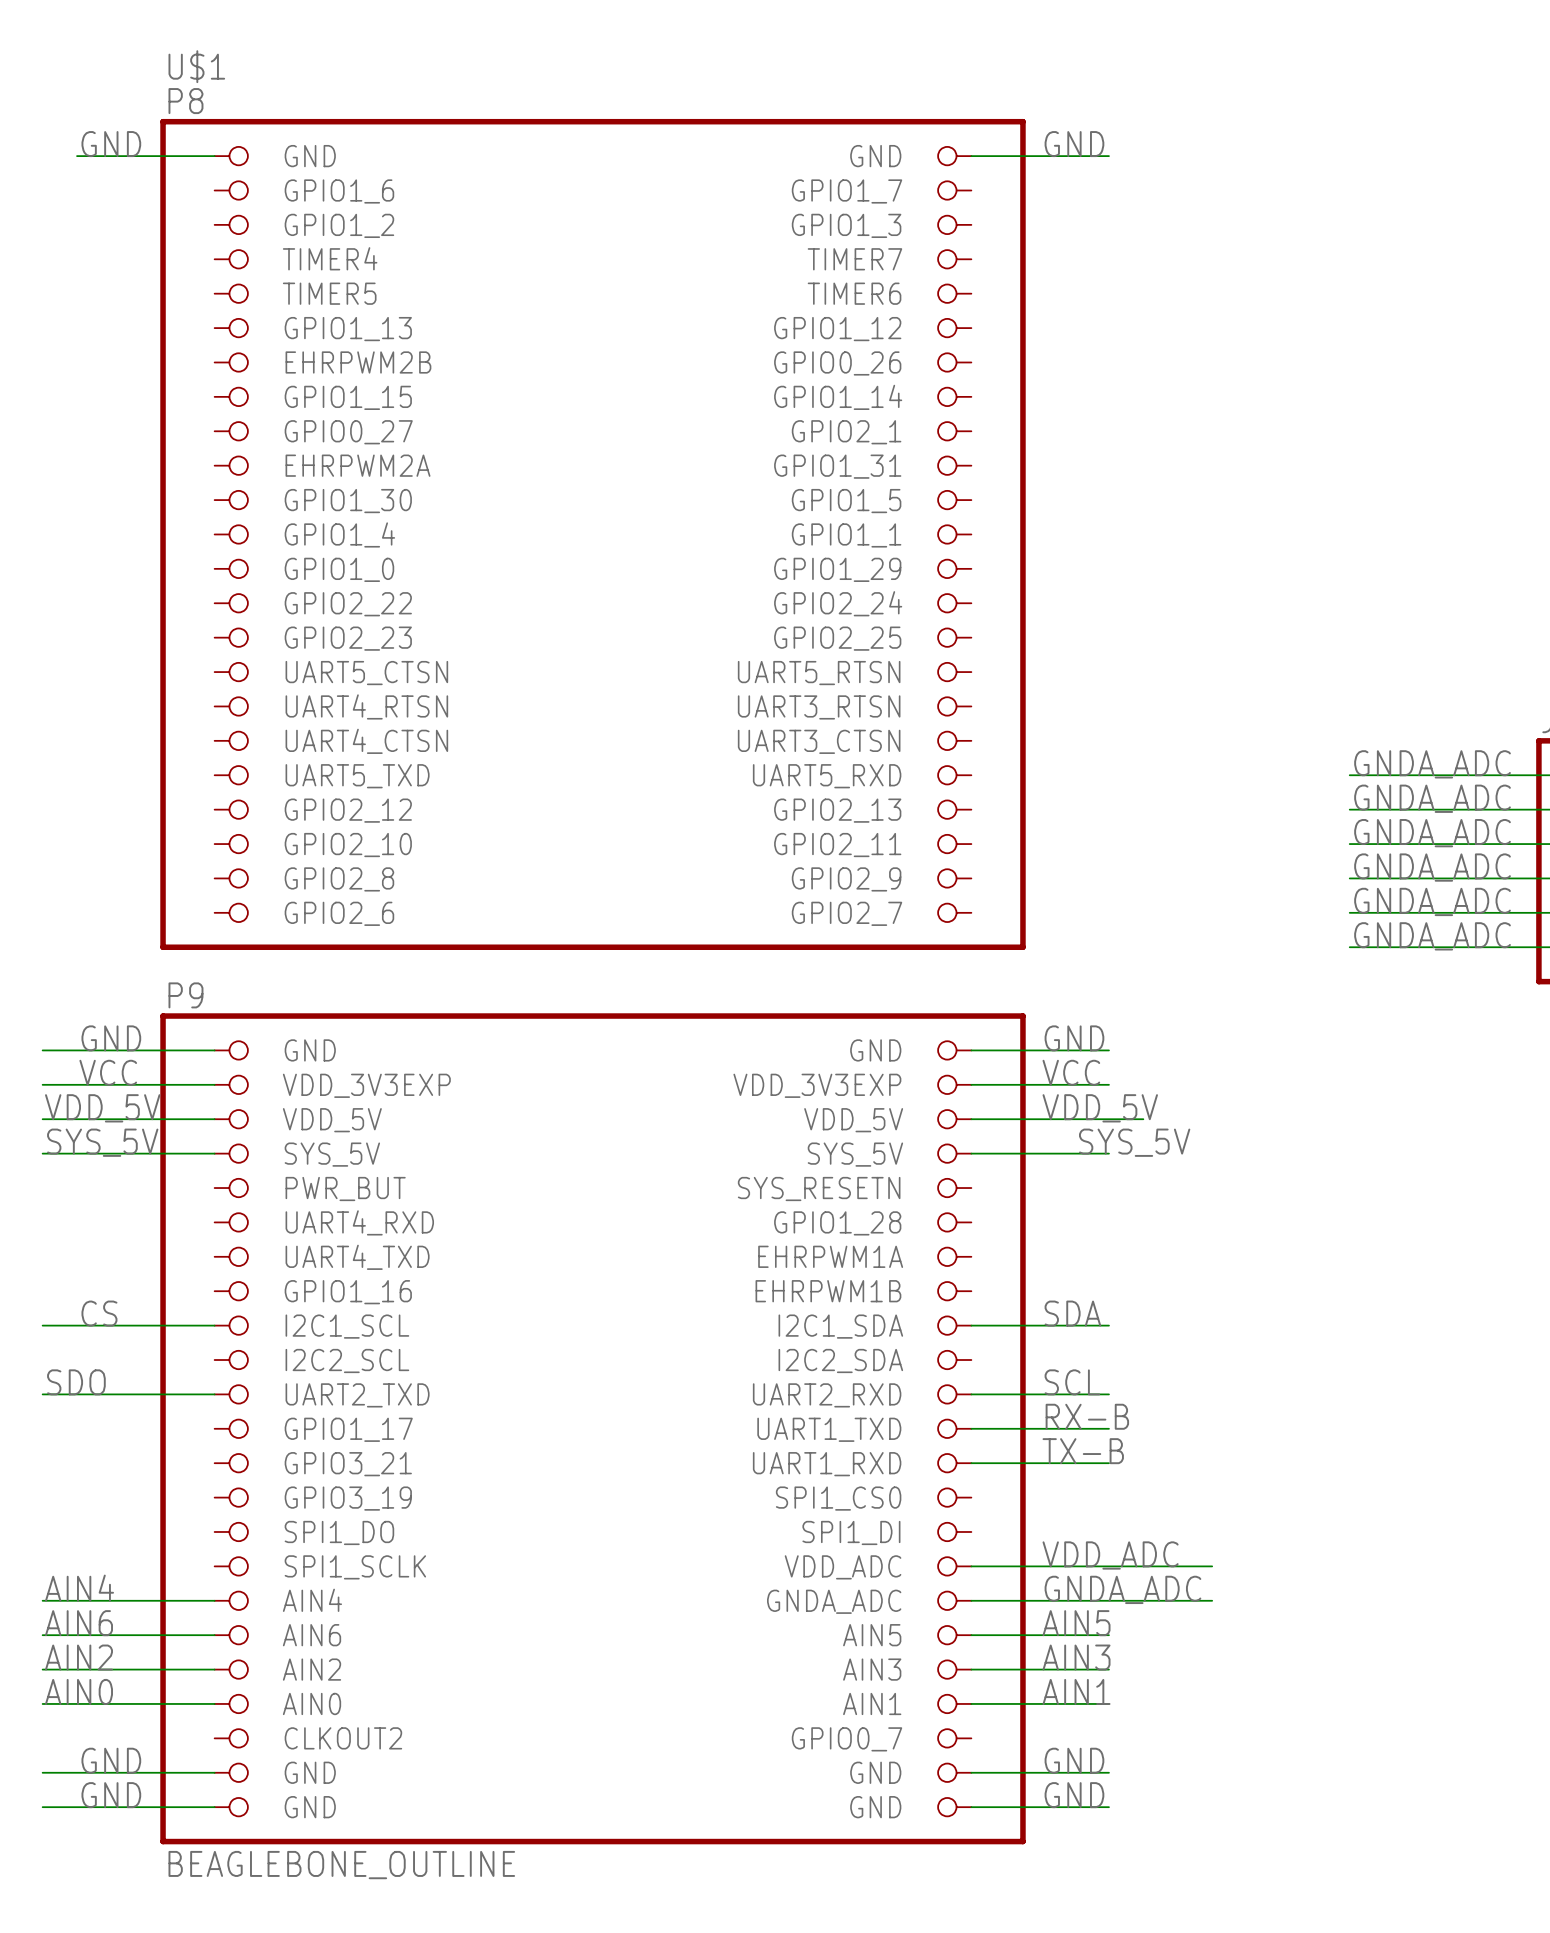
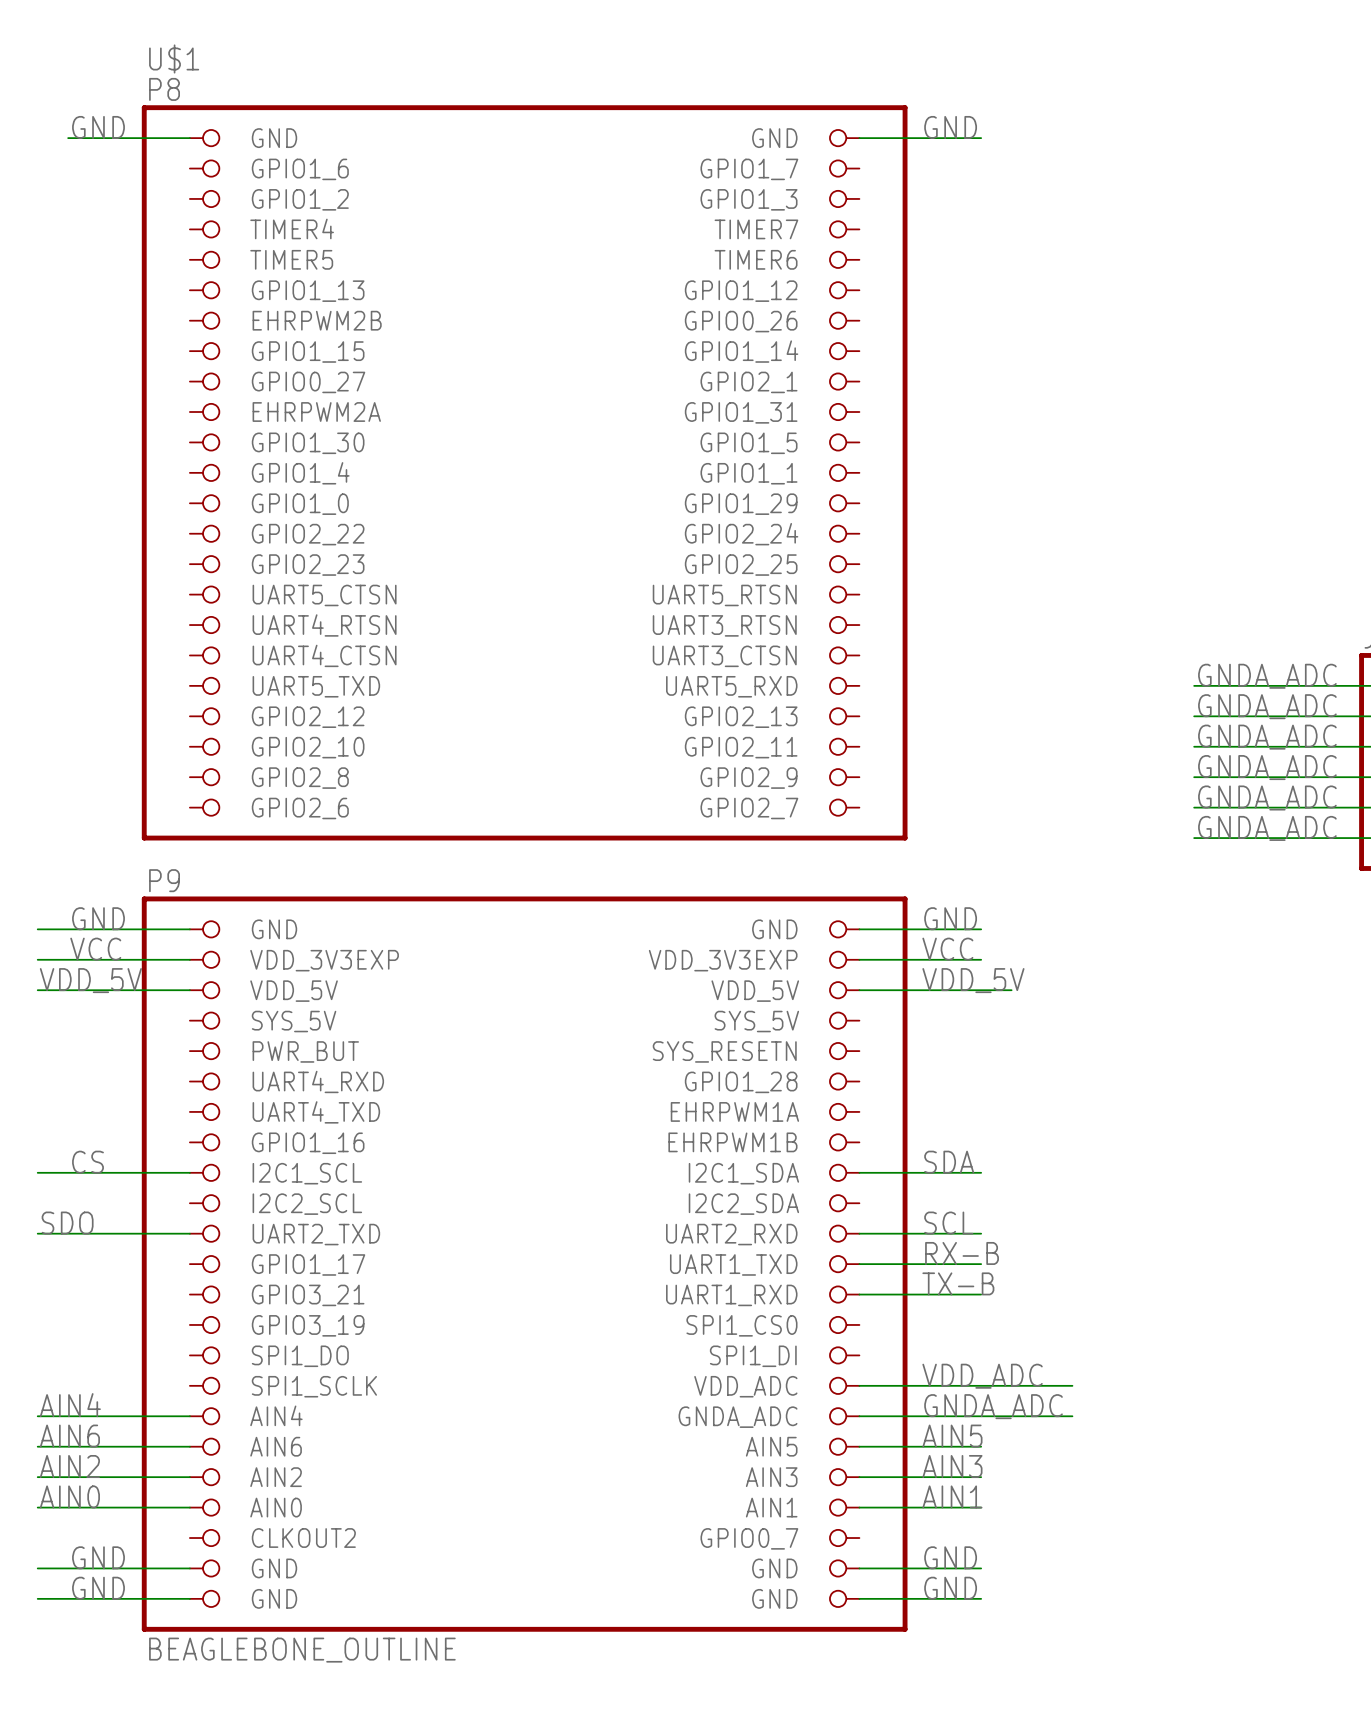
label: SYS_5V (102, 1142) -> none
label: SYS_5V (1134, 1142) -> none
wire: (42, 1153) (214, 1153) -> none
wire: (971, 1153) (1108, 1153) -> none

